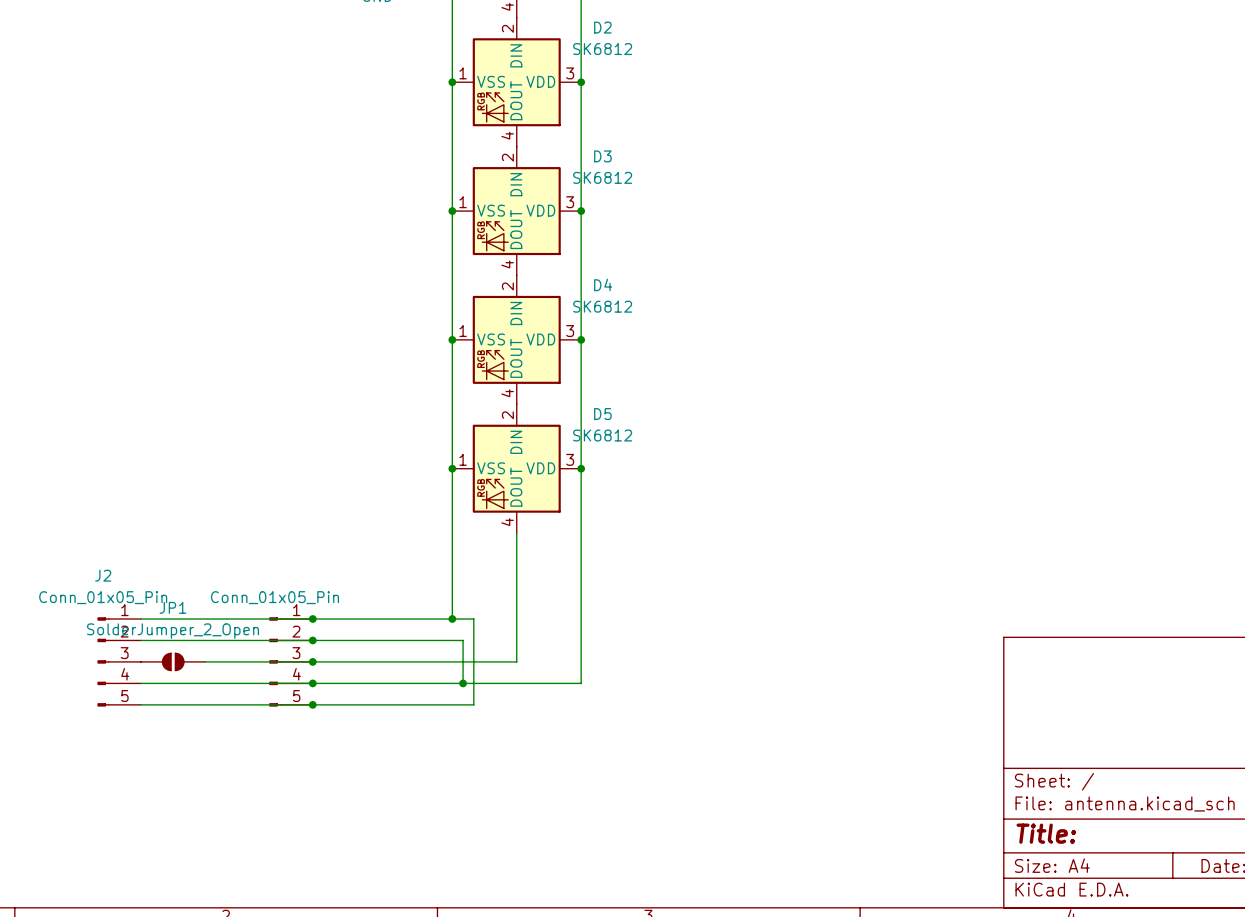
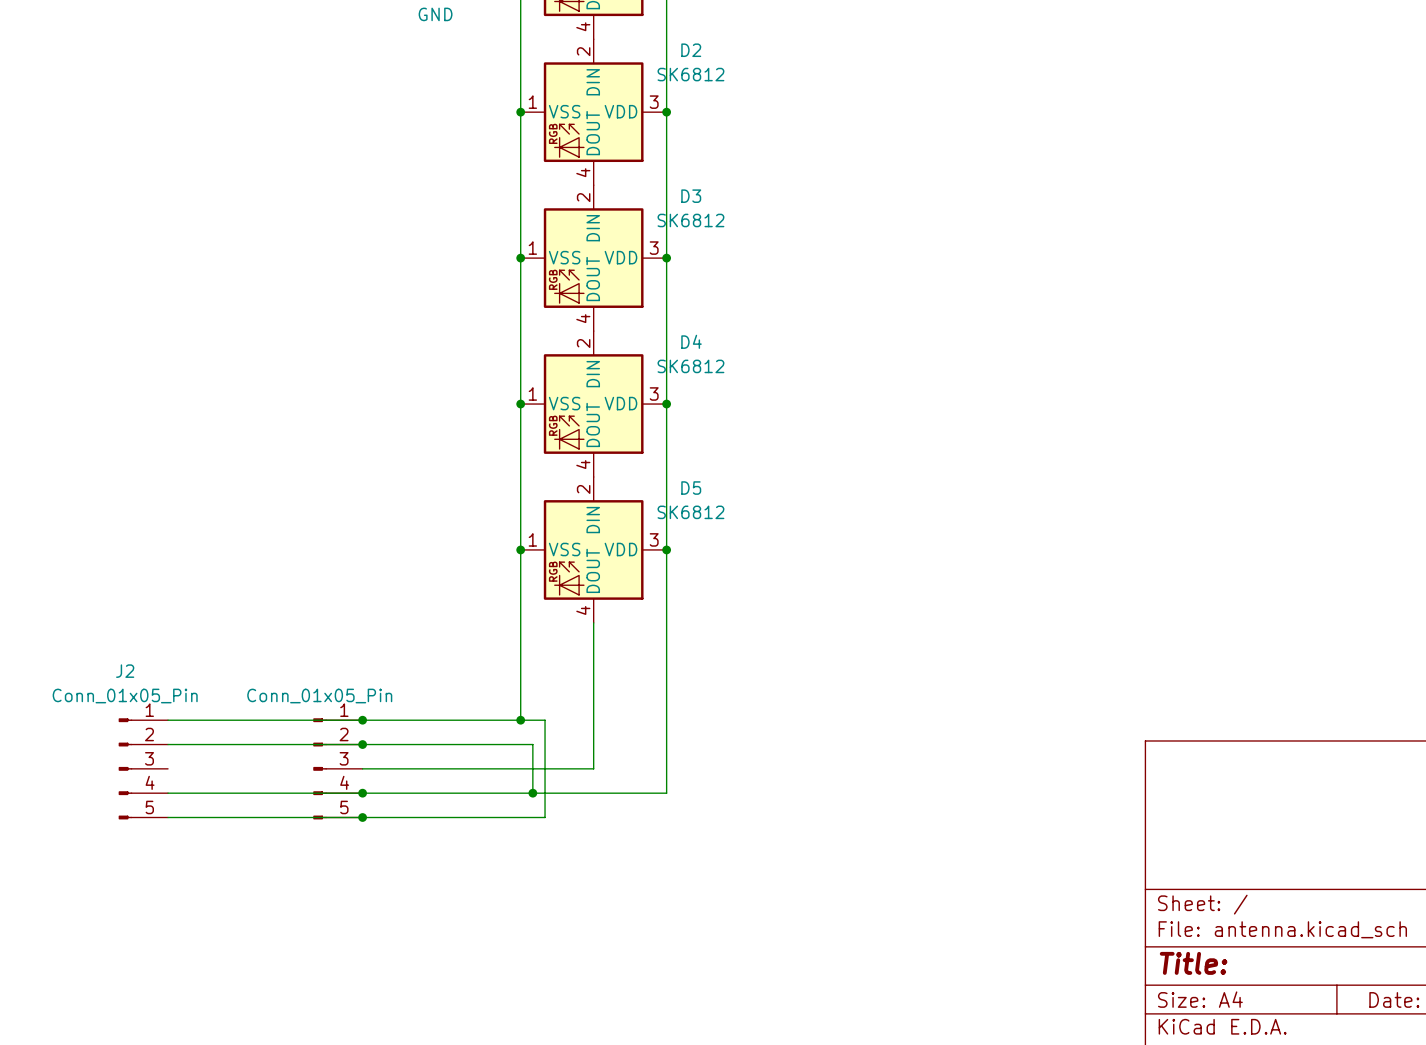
JP1: SolderJumper_2_Open (173, 661) -> none
wire: (205, 661) (312, 661) -> none
junction: (312, 661) -> none

